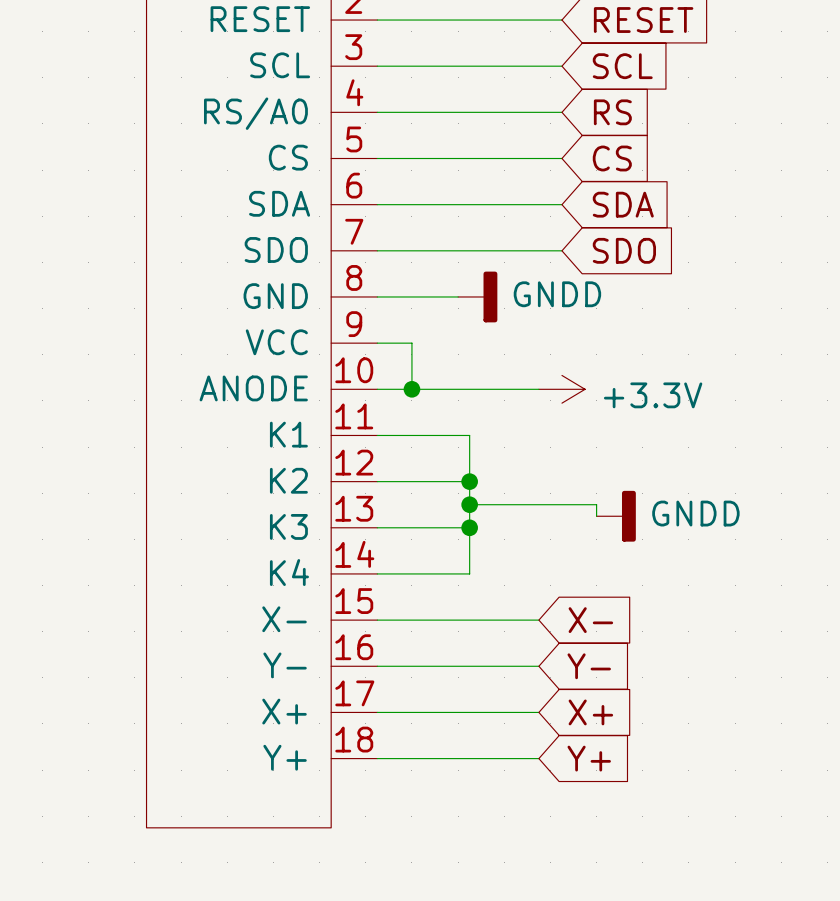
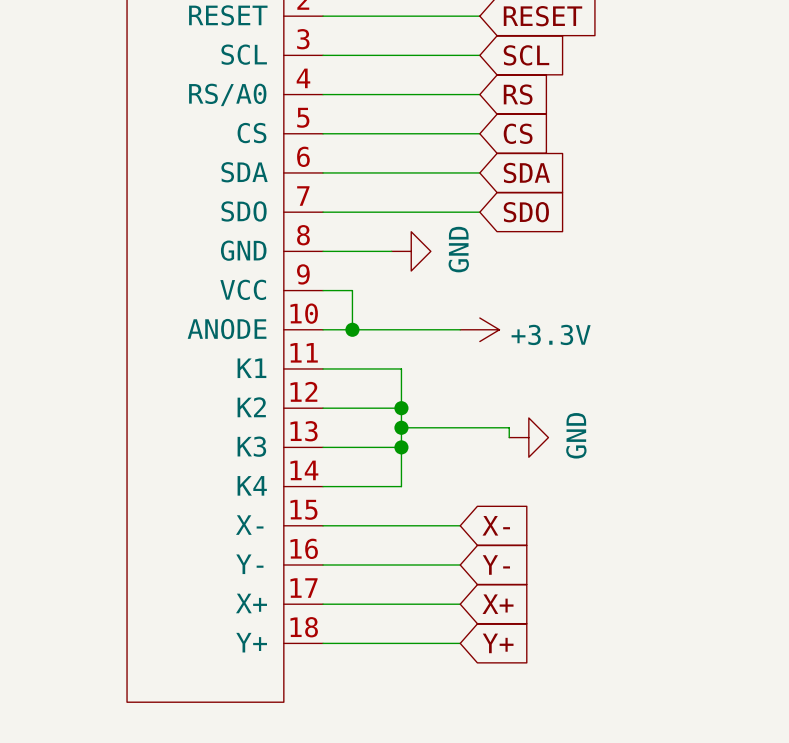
power symbol: GNDD (477, 296) -> GND (411, 251)
power symbol: GNDD (616, 516) -> GND (528, 437)

